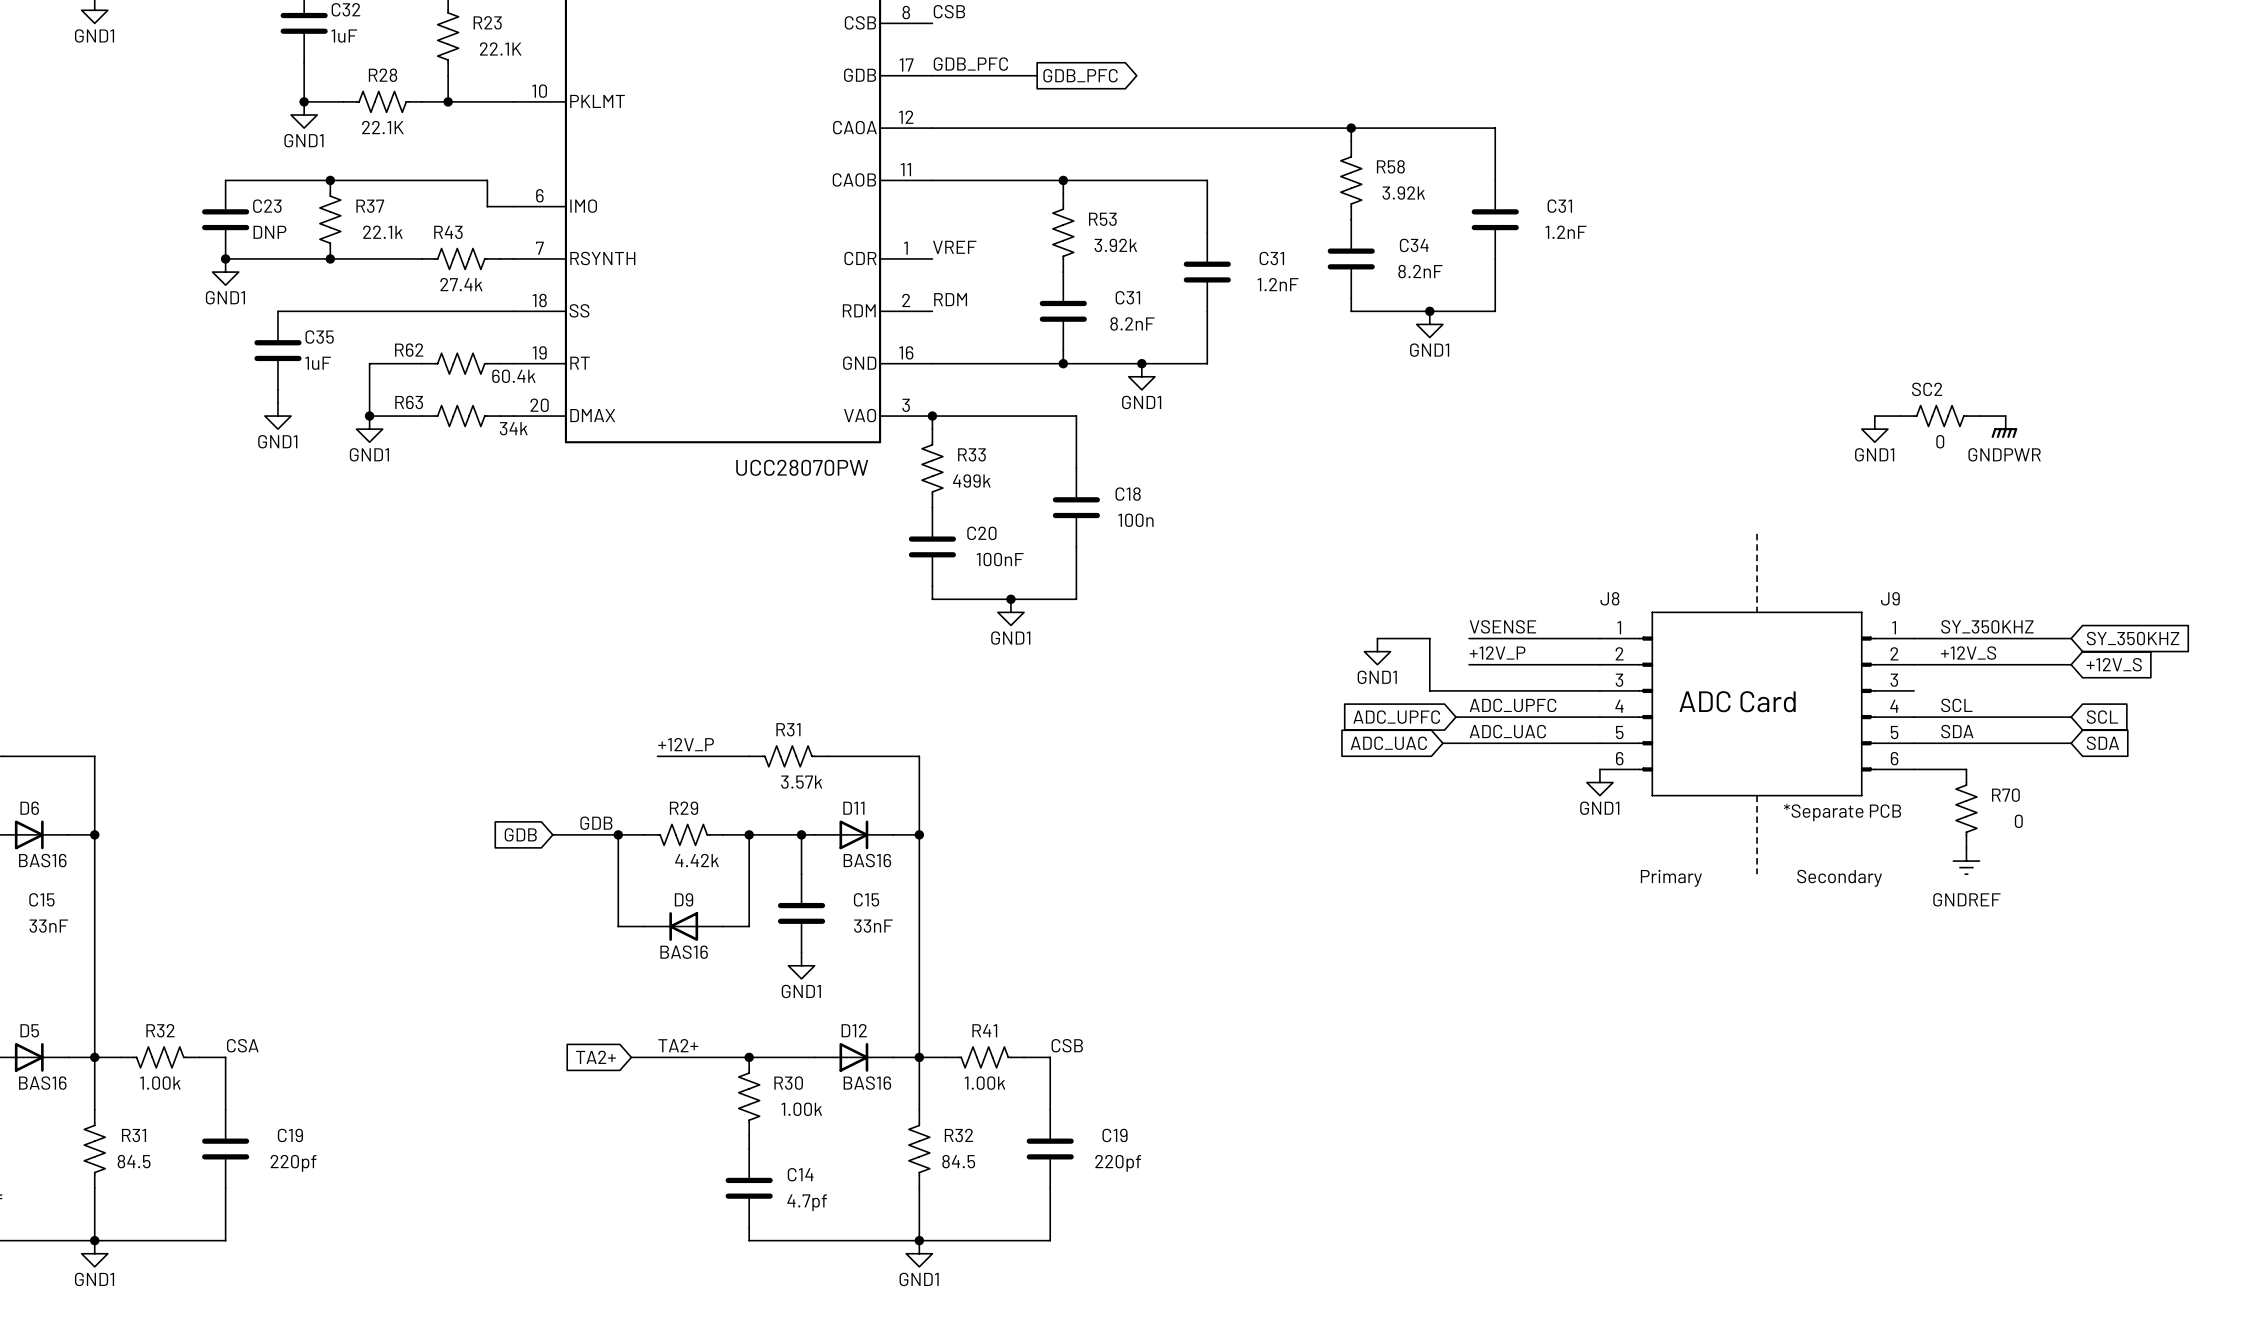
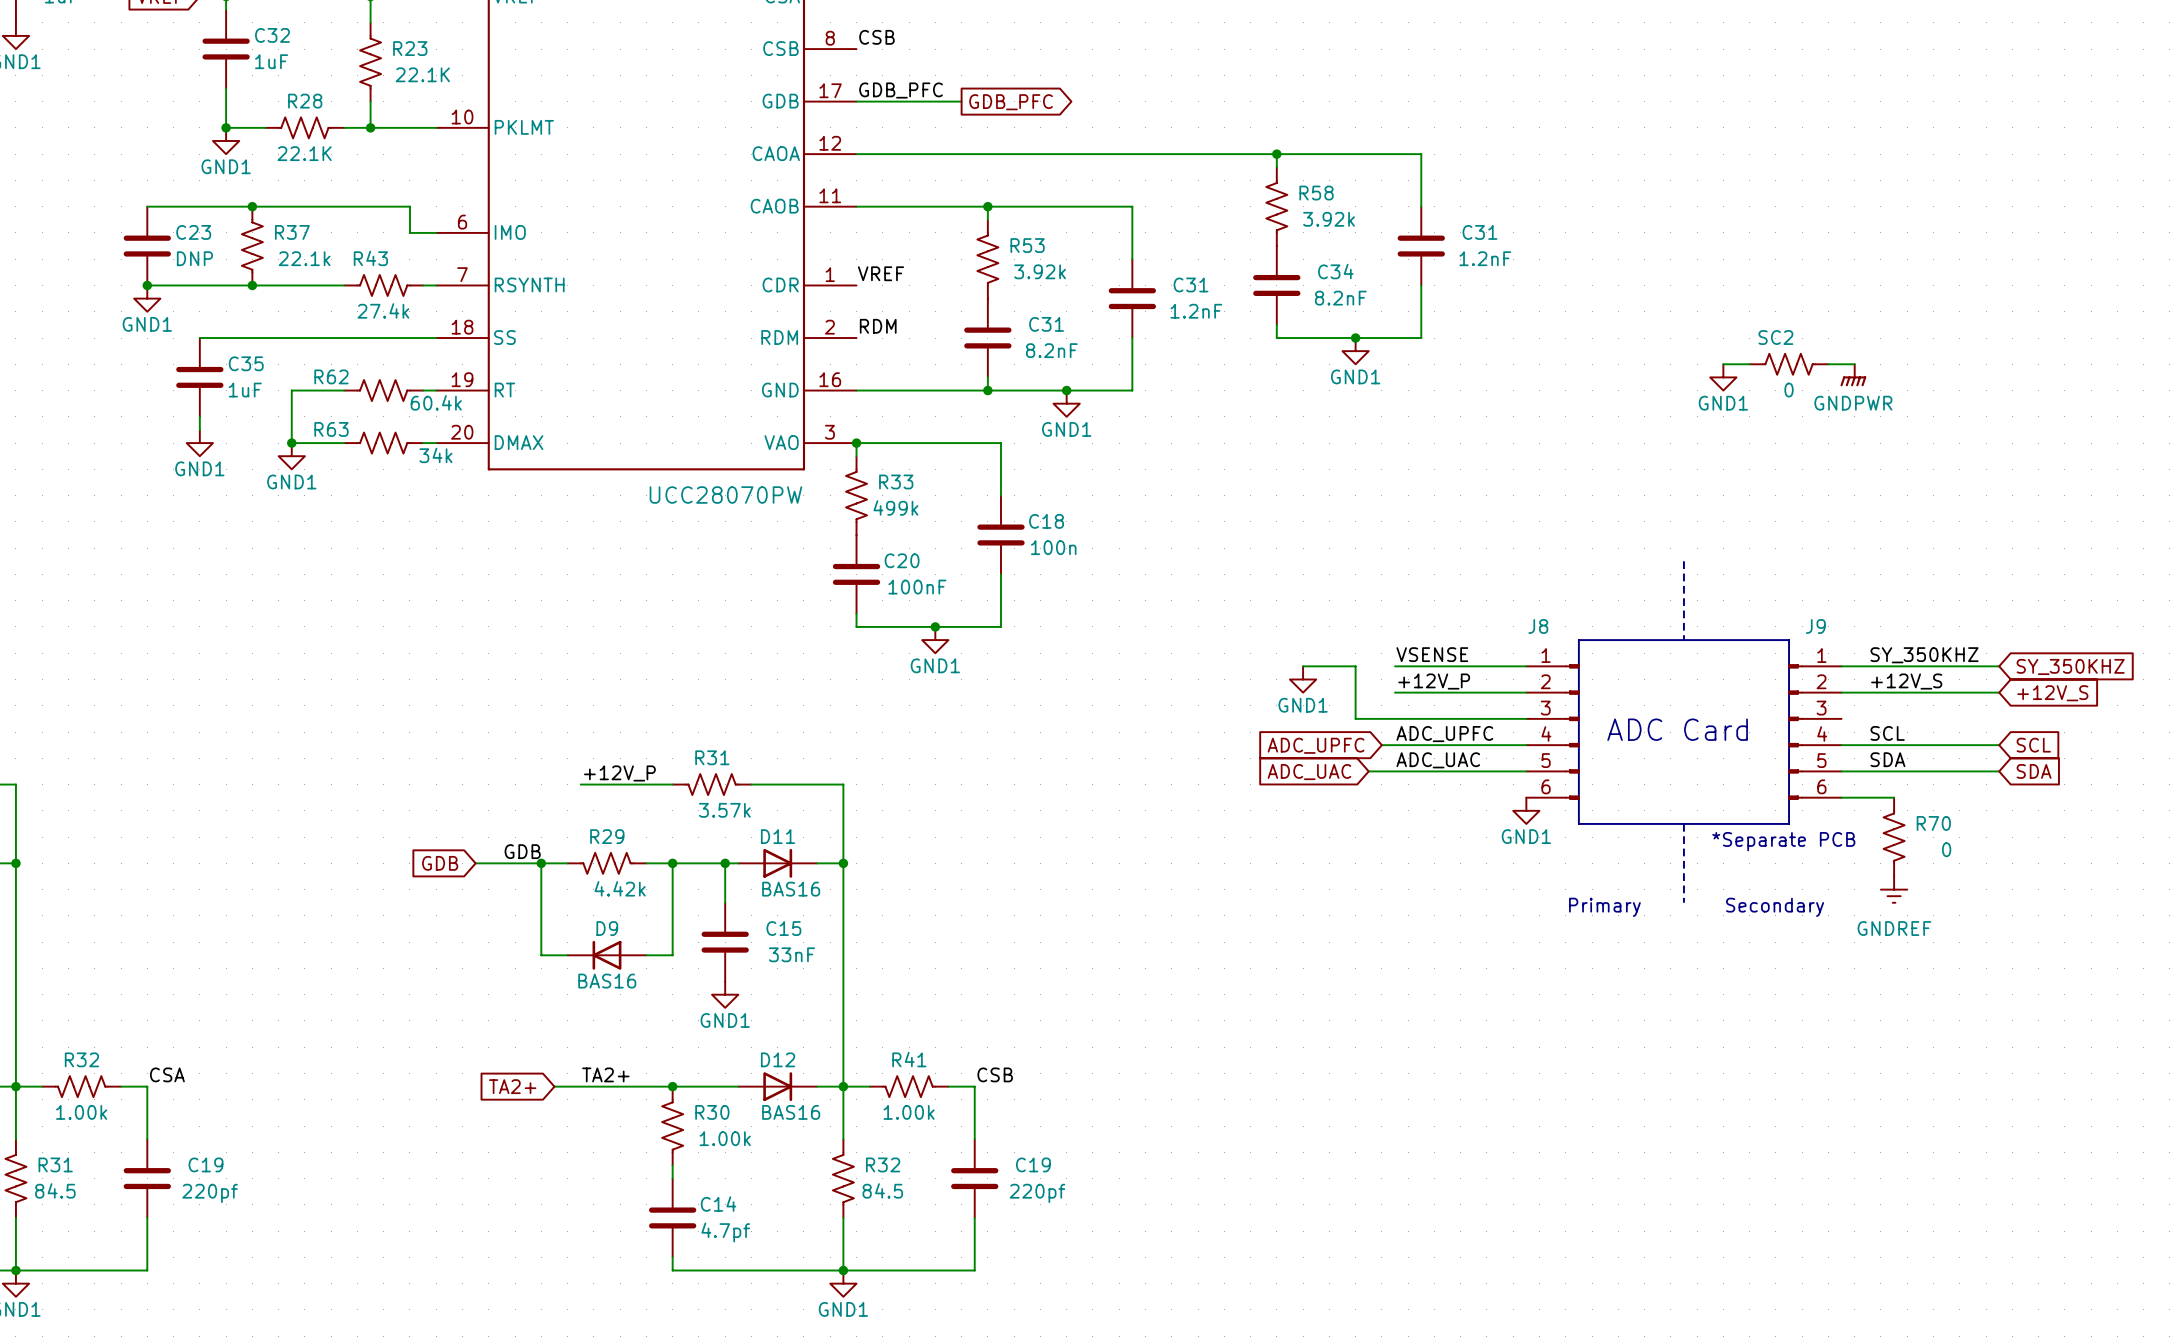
wire: (1874, 416) (1901, 416) -> (1828, 364) (1854, 364)
SC2 position: (1940, 416) -> (1789, 364)
wire: (1979, 416) (2005, 416) -> (1723, 364) (1749, 364)
power symbol position: GNDPWR (2004, 427) -> GNDPWR (1853, 375)
power symbol position: GND1 (1874, 429) -> GND1 (1723, 377)

